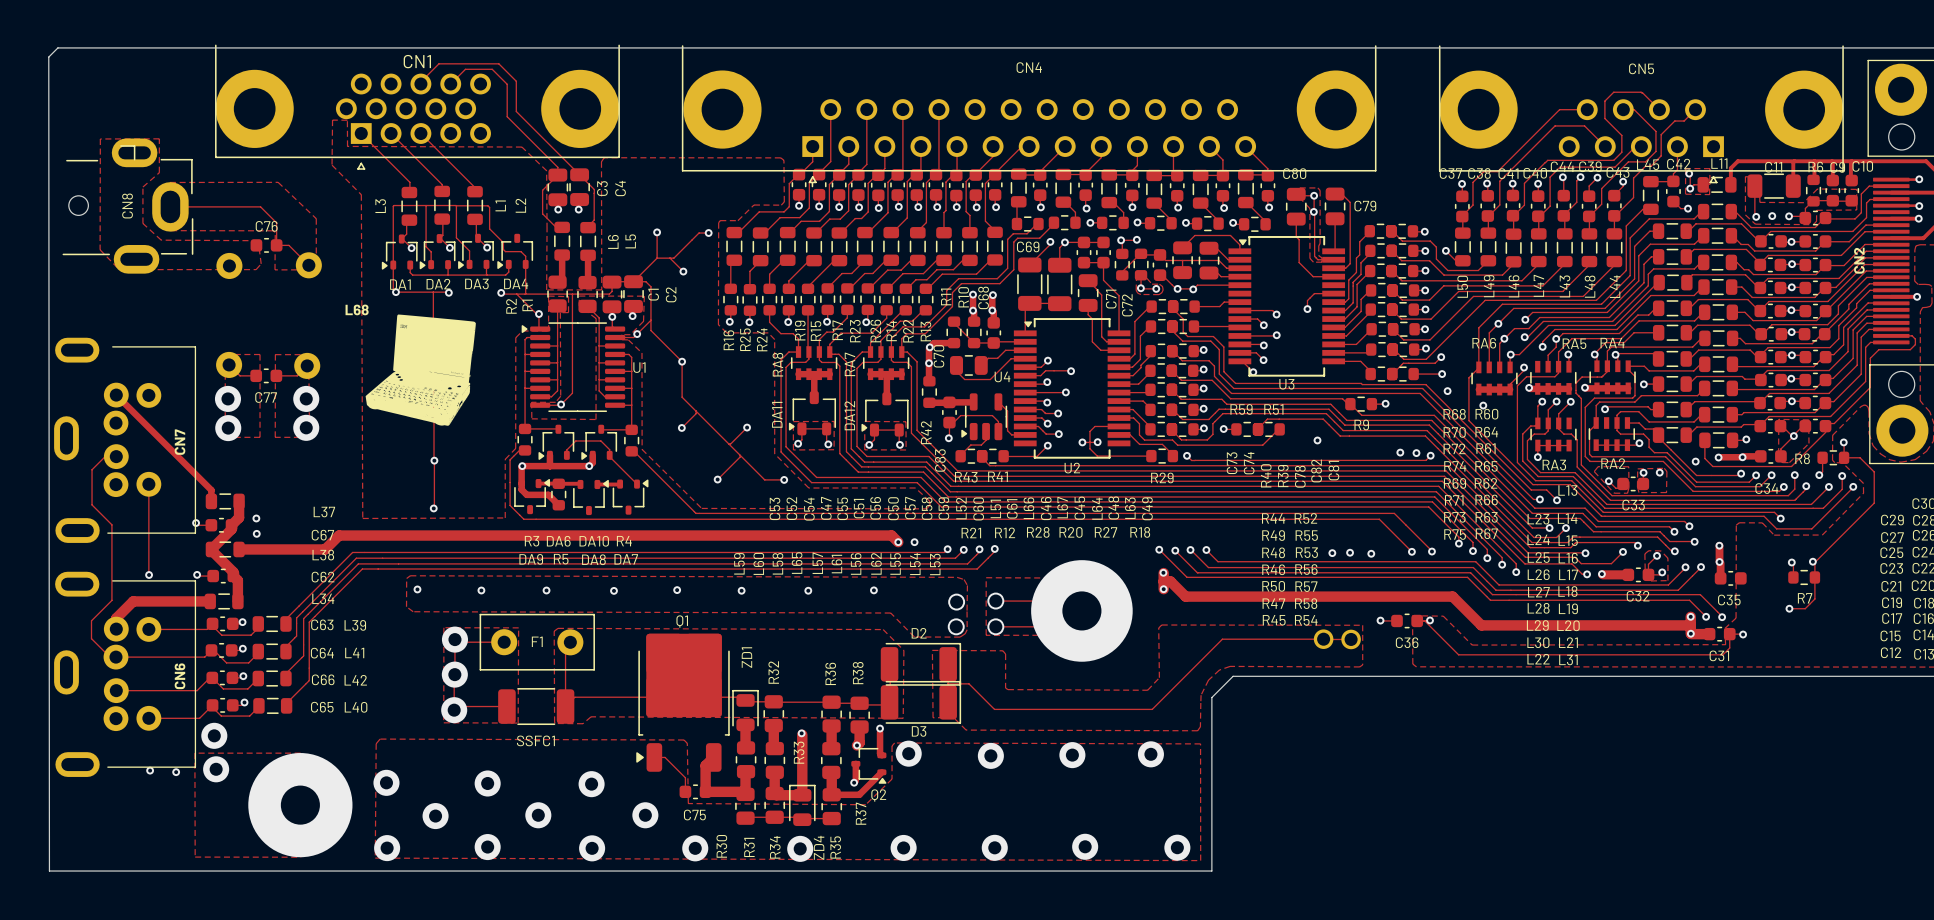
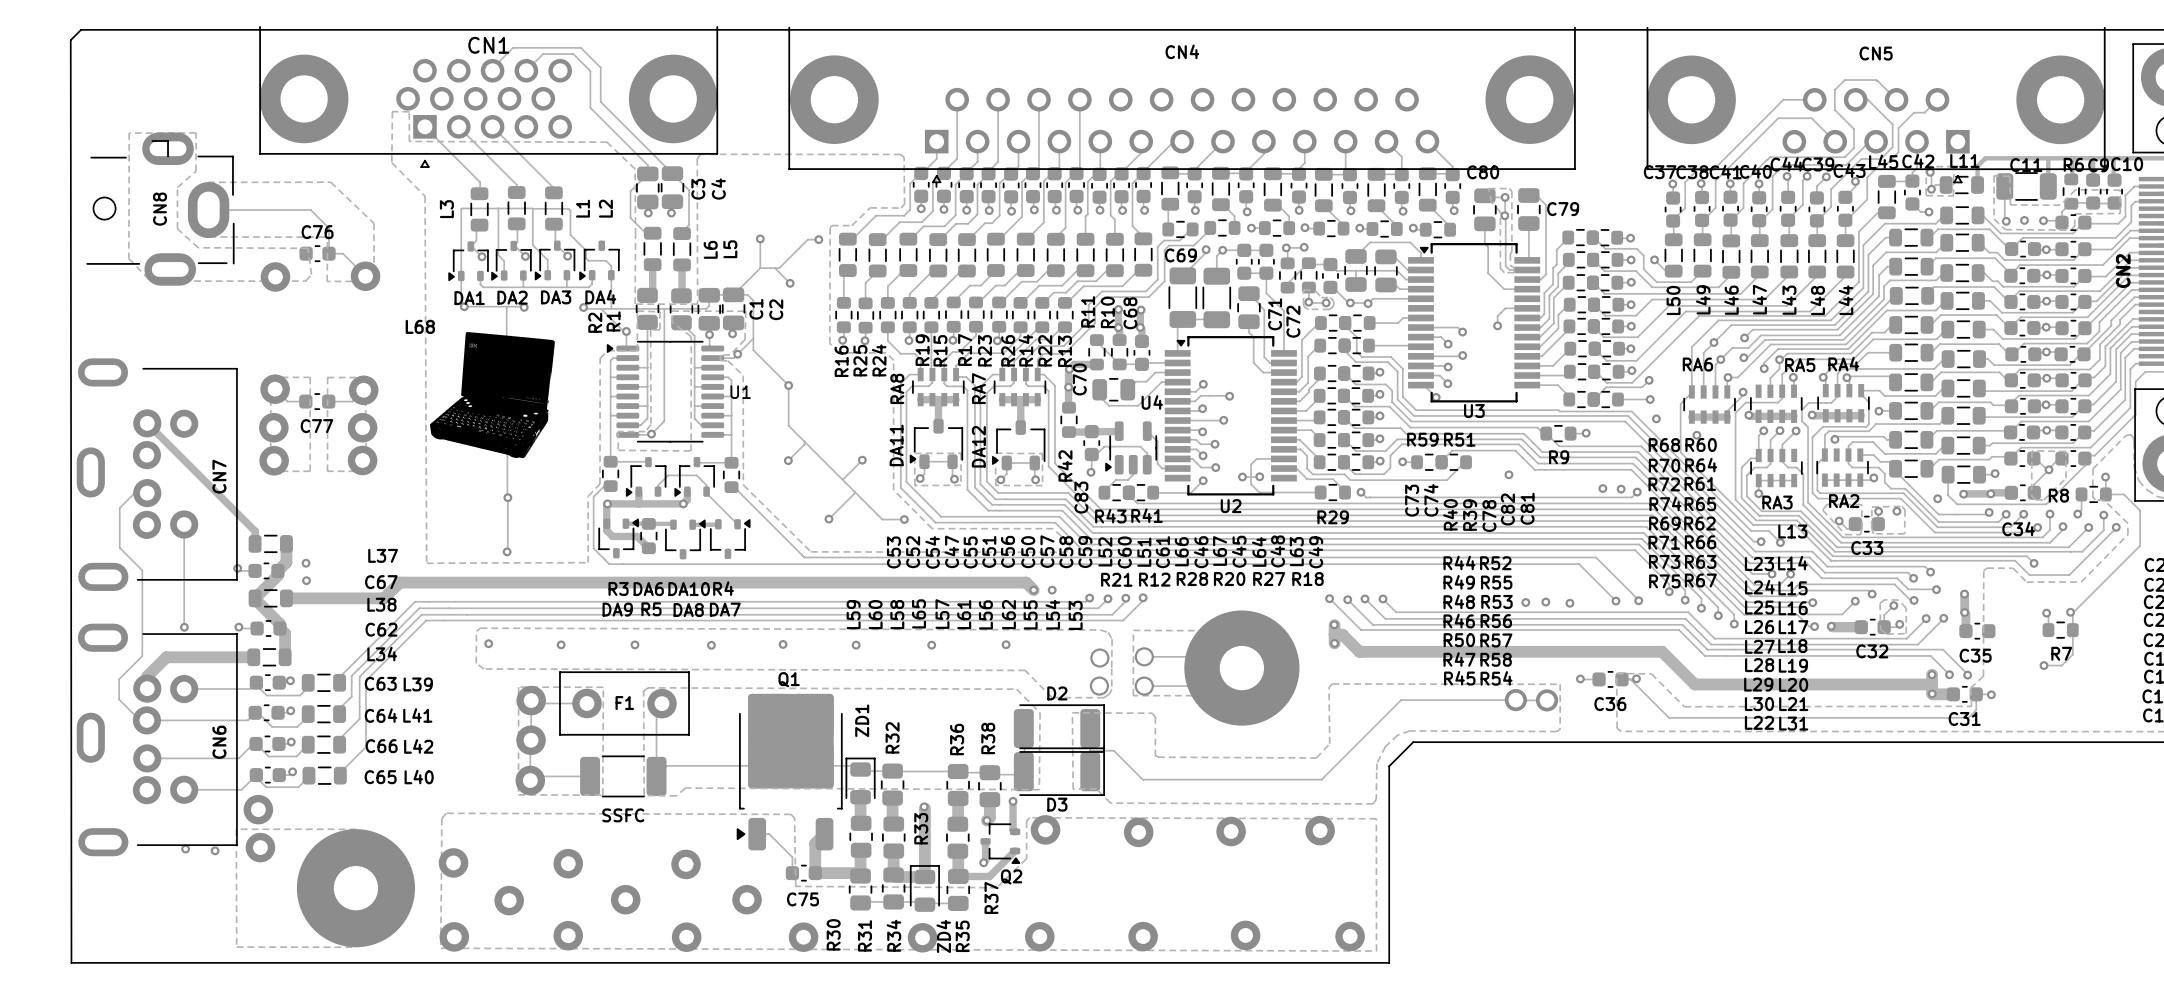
SSFC1 name: SSFC1 (535, 740) -> SSFC (623, 815)

